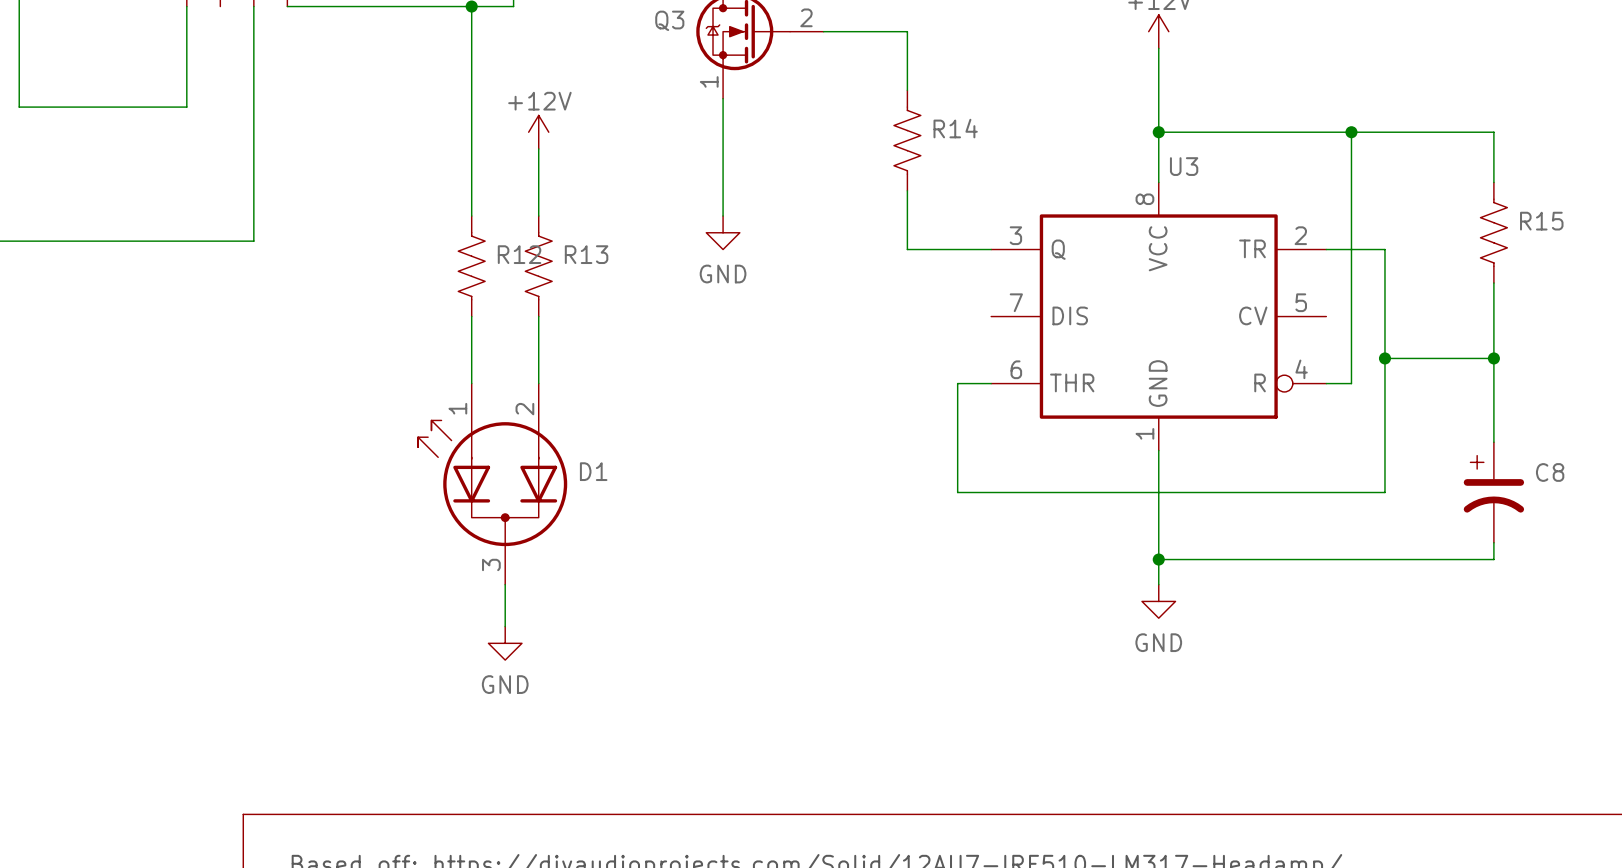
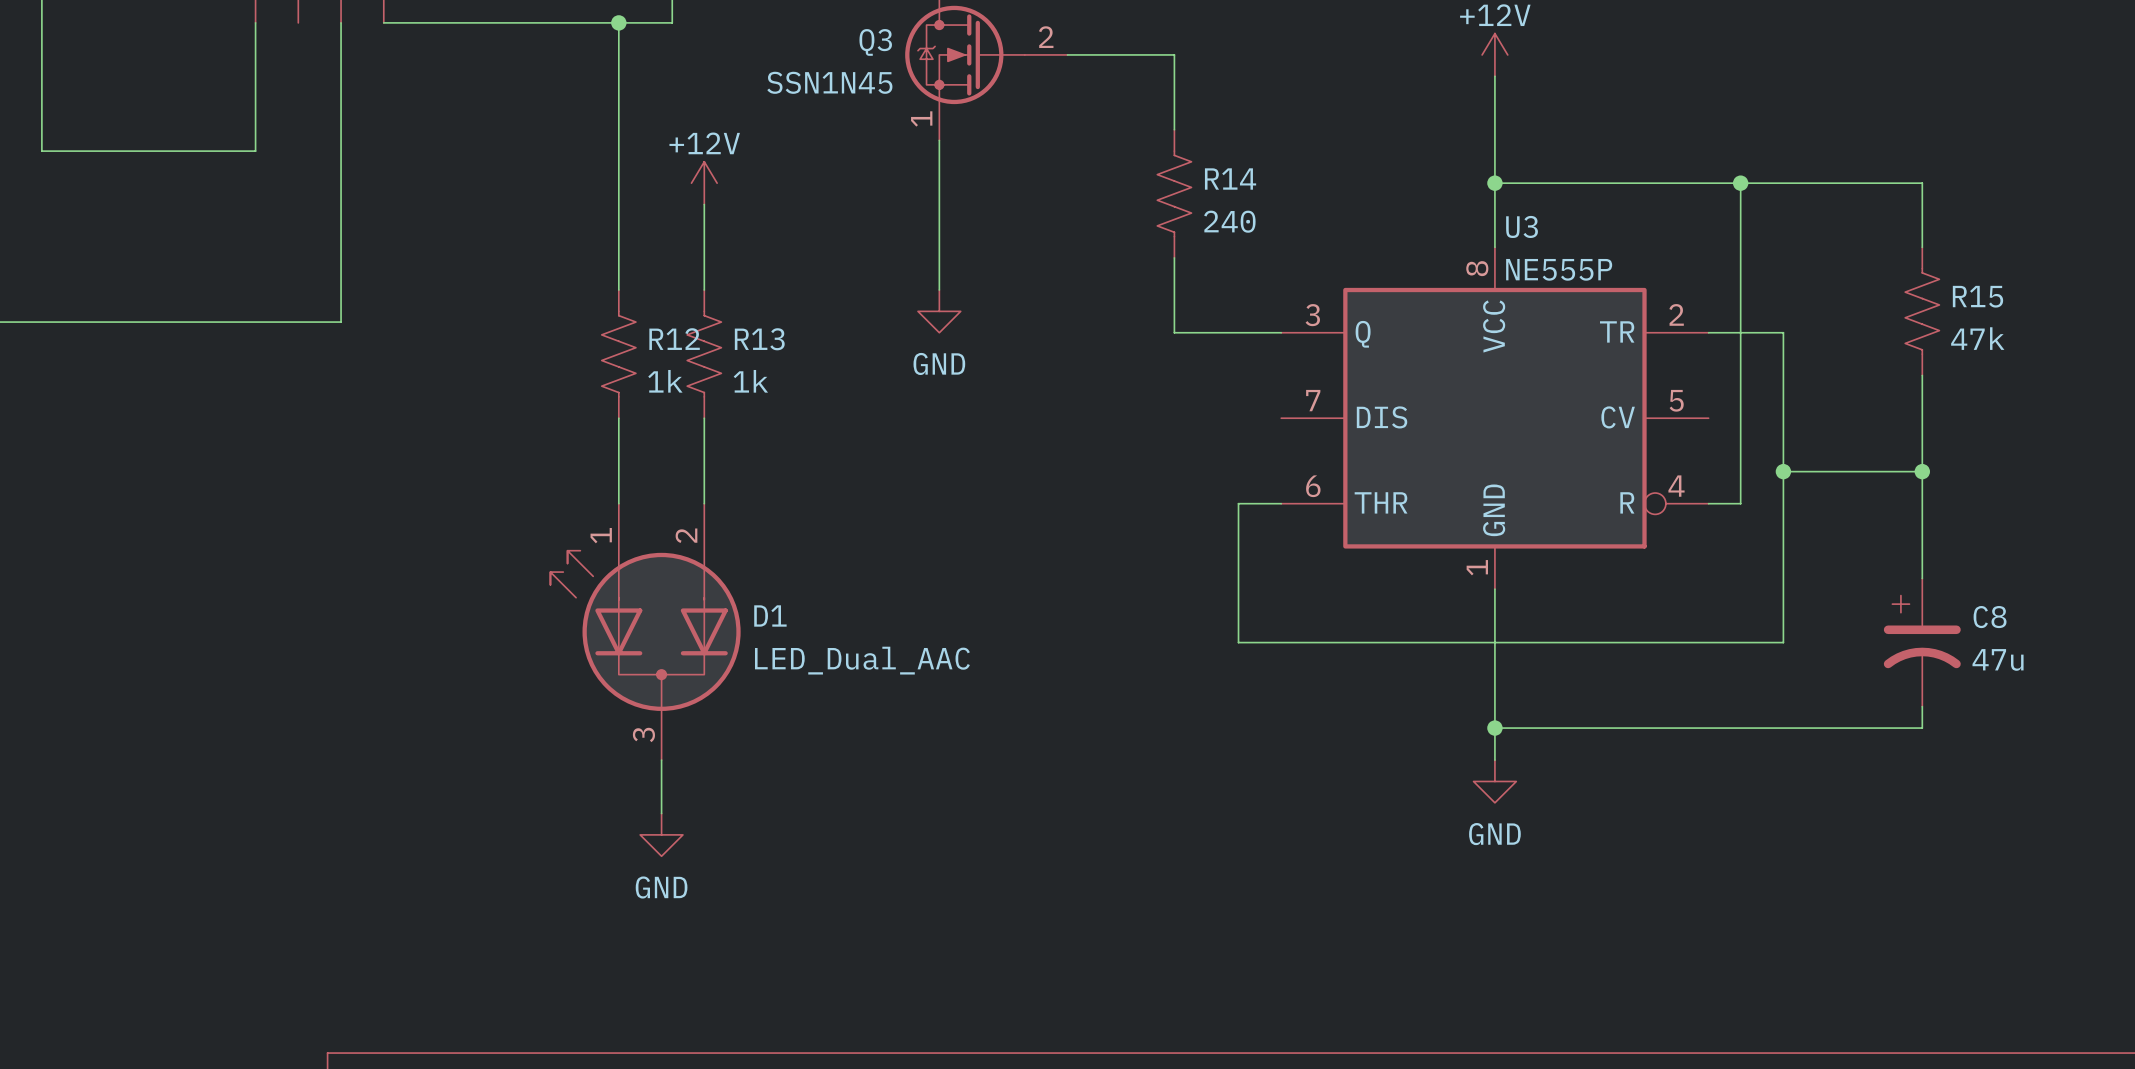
Q3 value: none -> SSN1N45 (829, 82)
R14 value: none -> 240 (1229, 221)
U3 value: none -> NE555P (1559, 269)
R15 value: none -> 47k (1977, 338)
R12 value: none -> 1k (665, 381)
R13 value: none -> 1k (750, 381)
D1 value: none -> LED_Dual_AAC (862, 660)
C8 value: none -> 47u (1998, 659)

